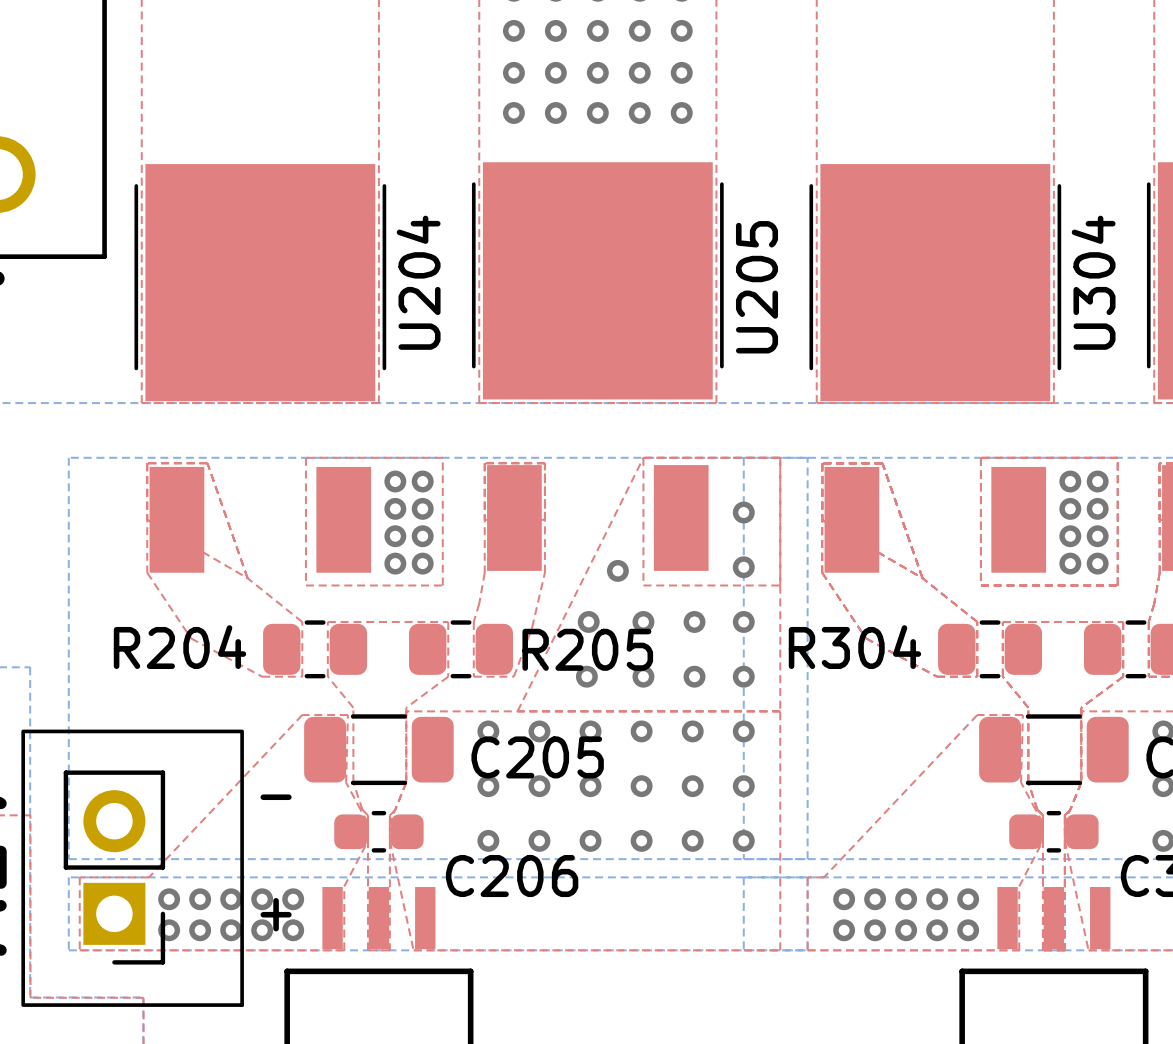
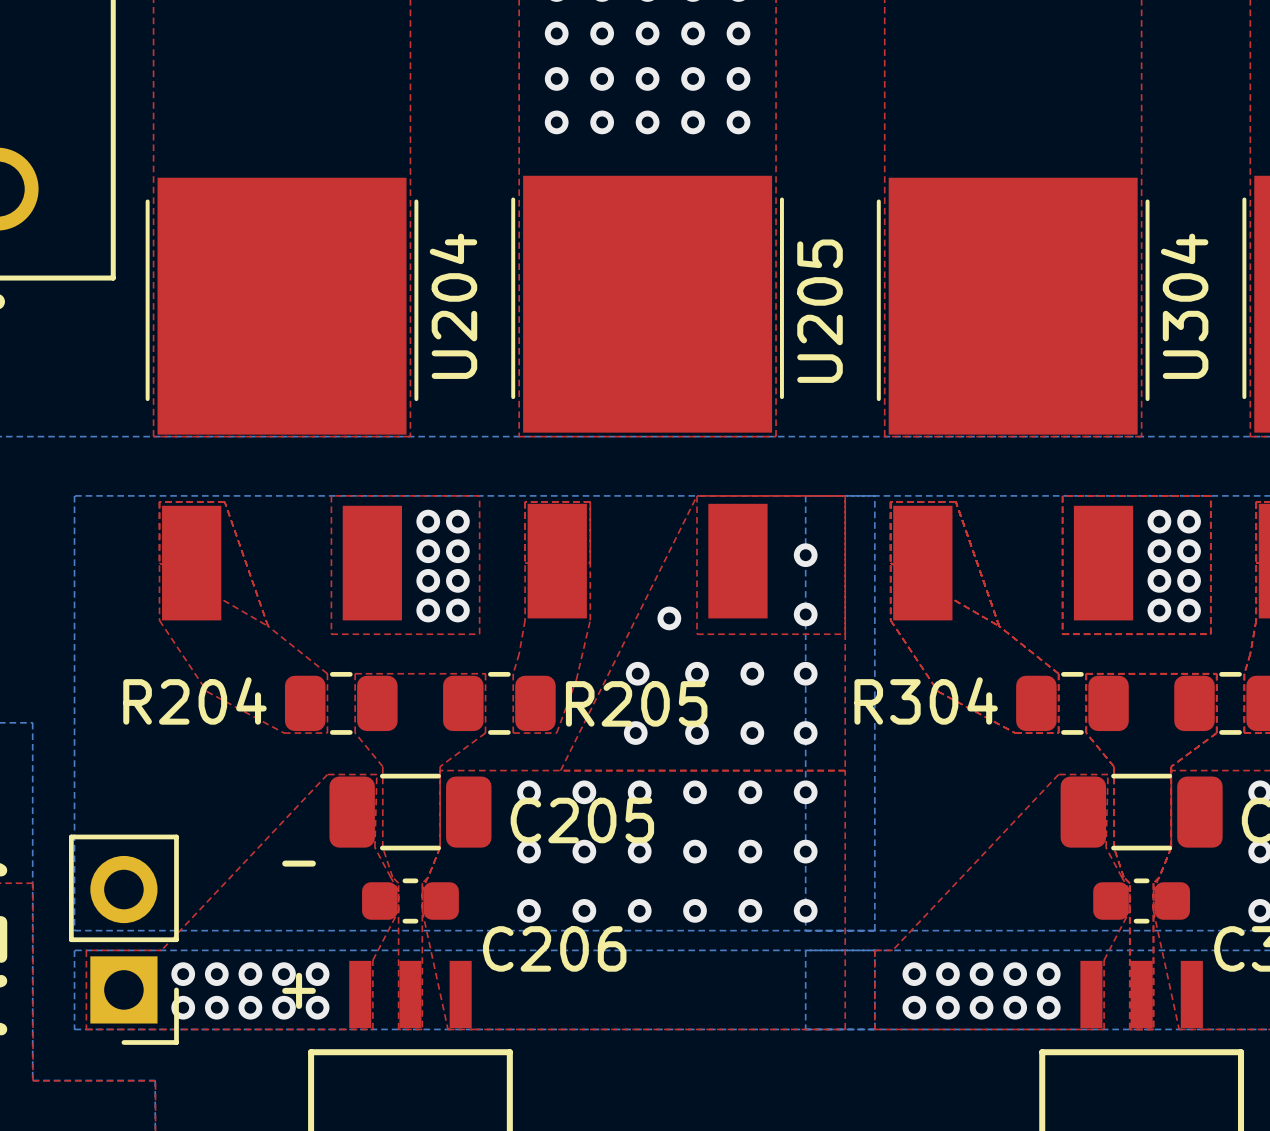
part footprint: [21, 729, 244, 1007] -> [68, 834, 179, 1045]

